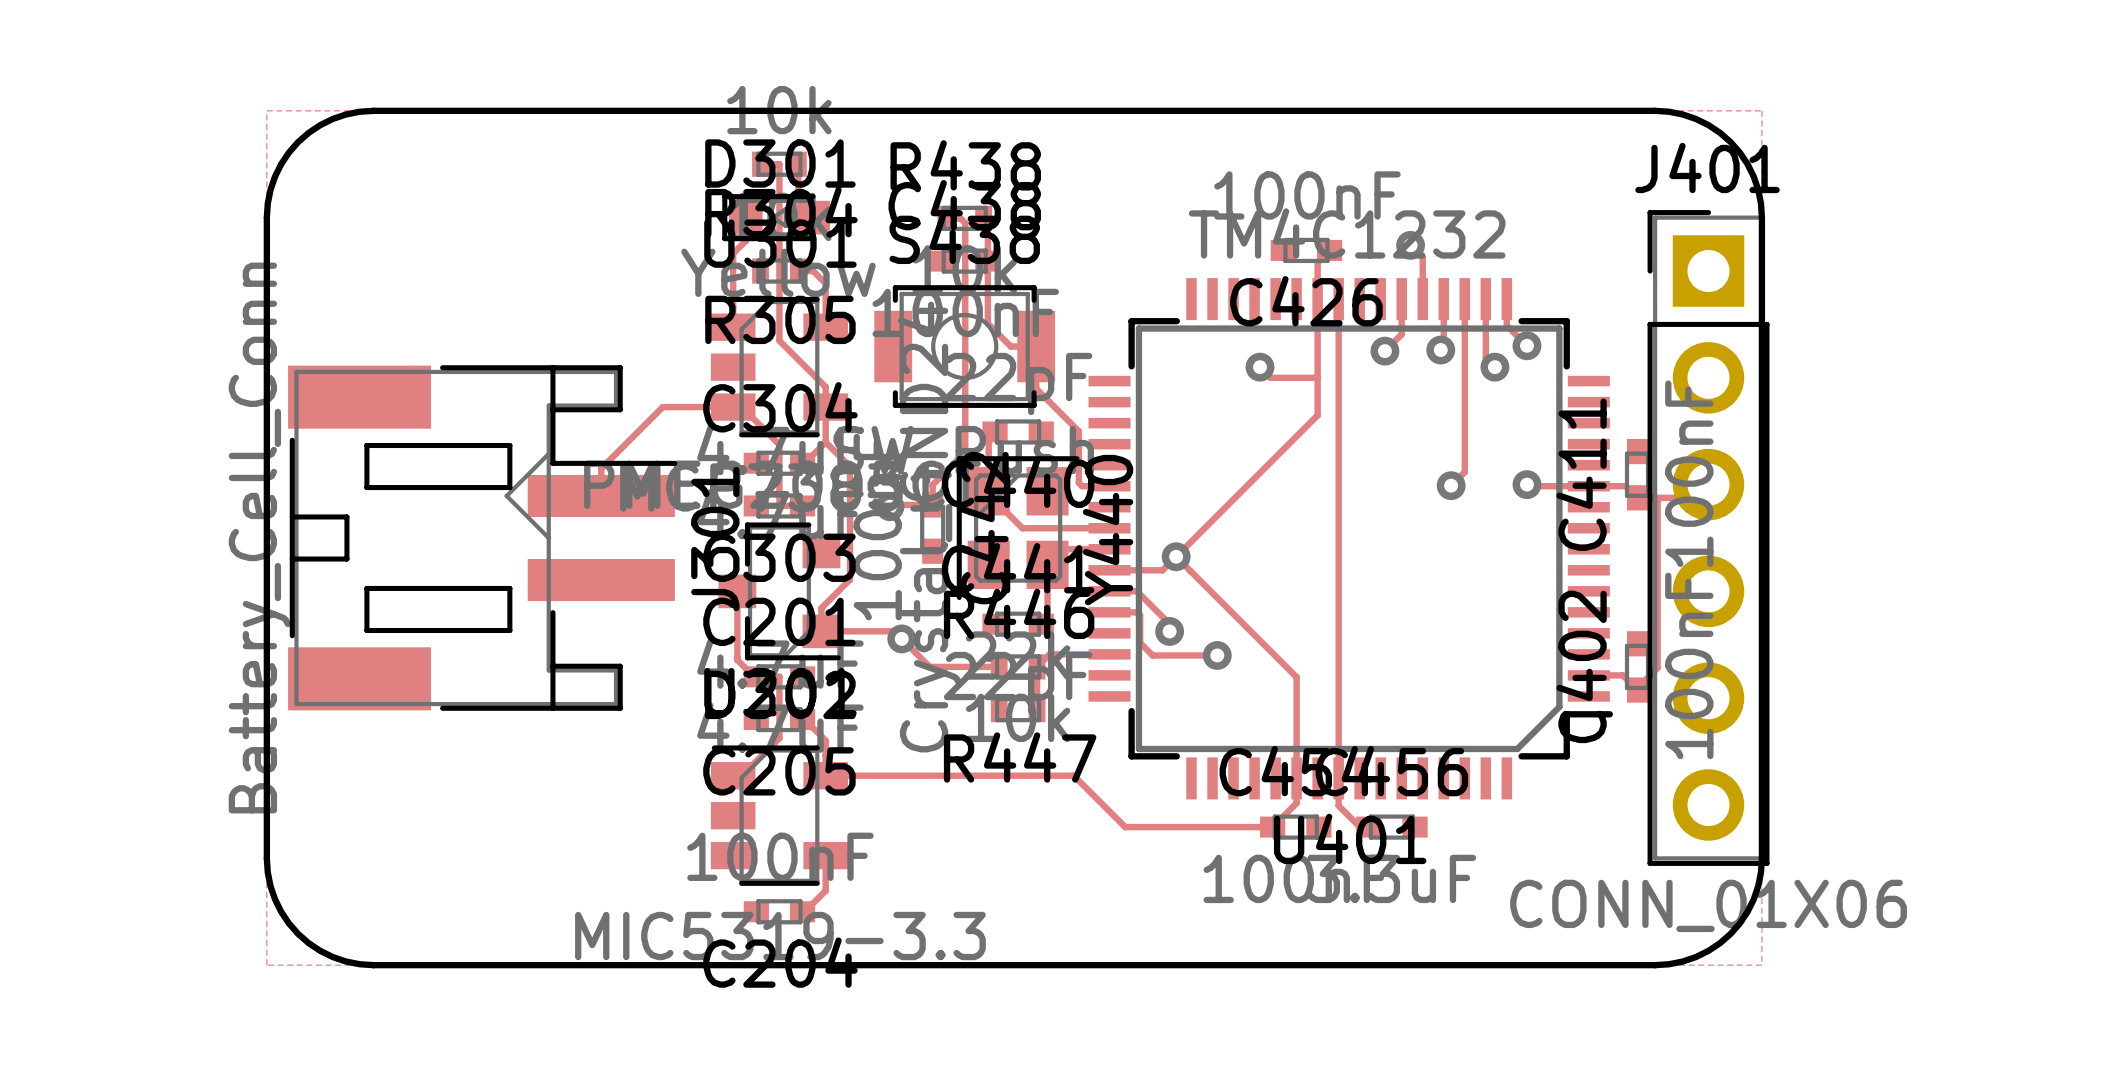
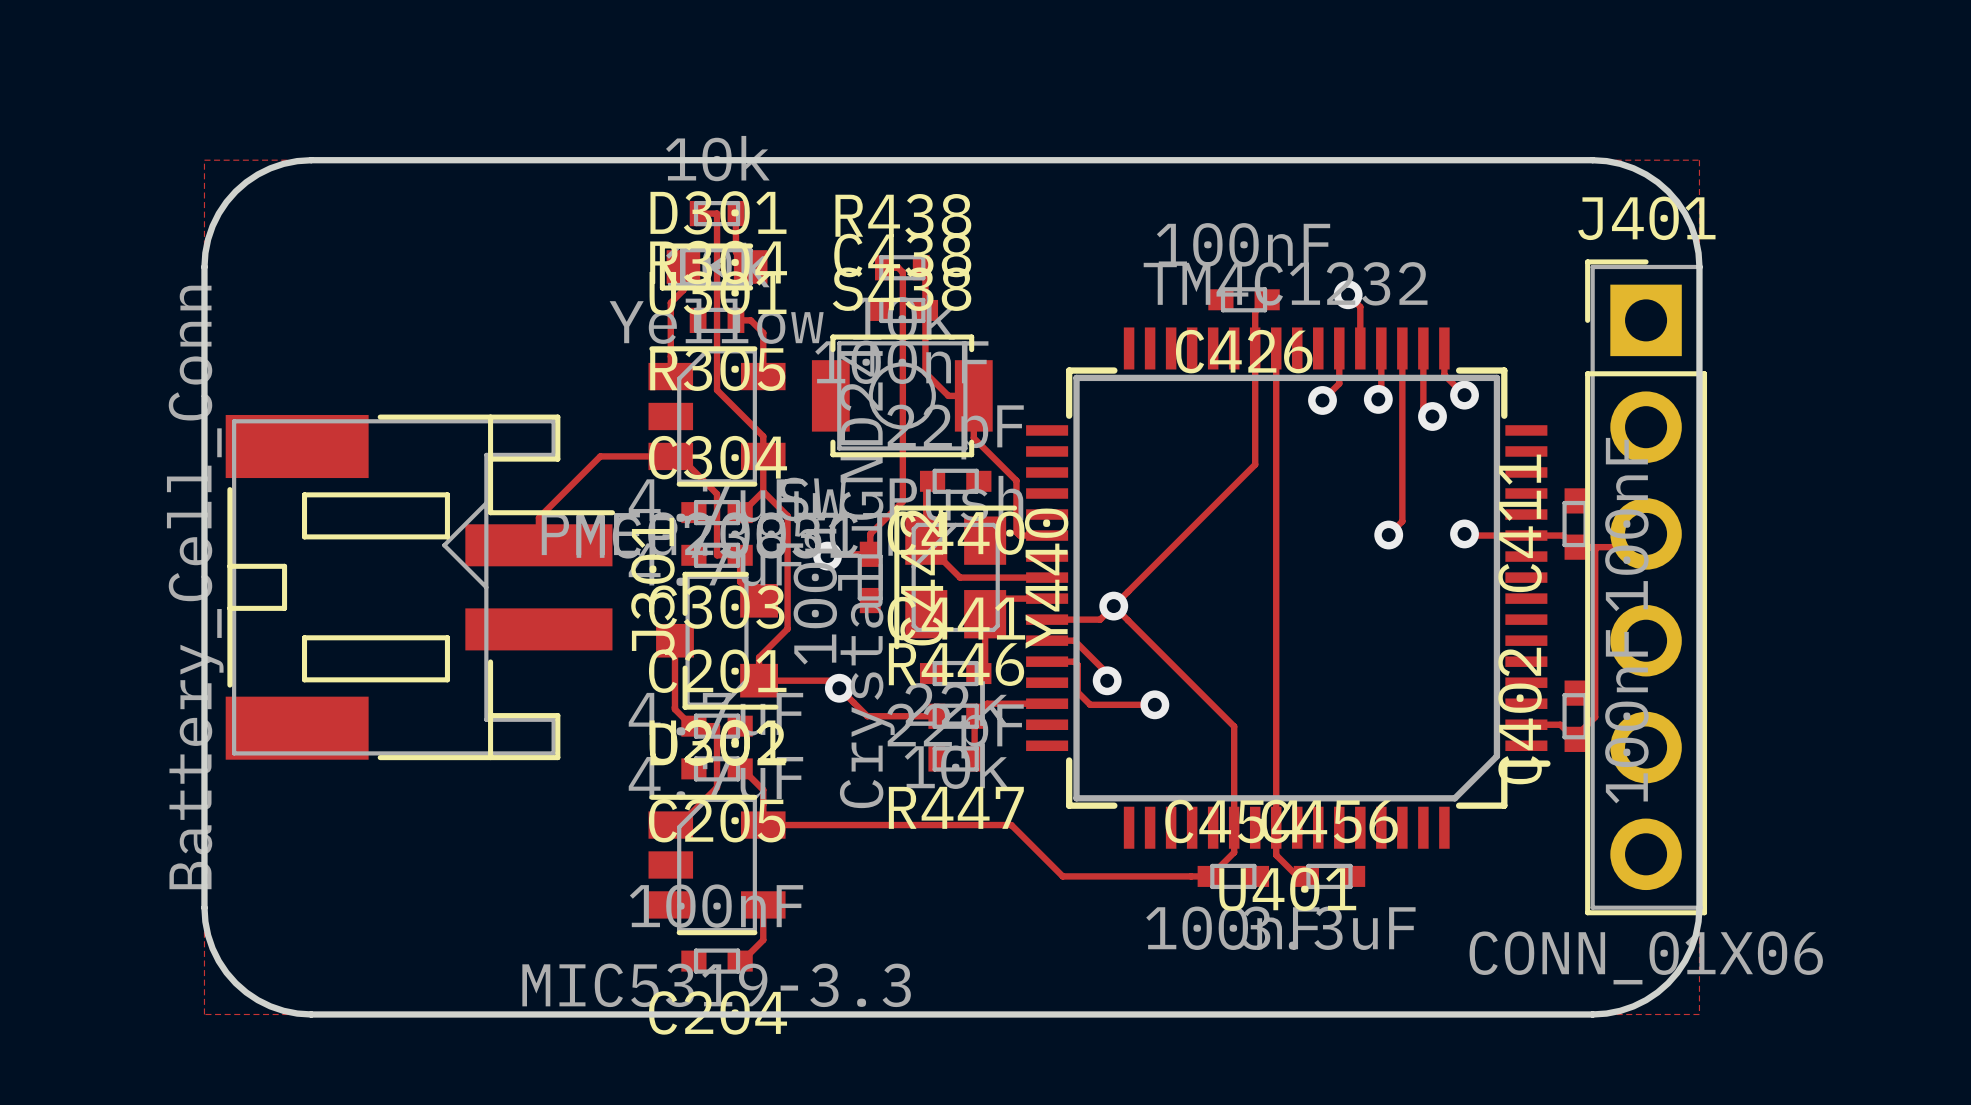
track: (1259, 367) (1270, 377) (1317, 377) -> none
via: (1259, 367) -> none

